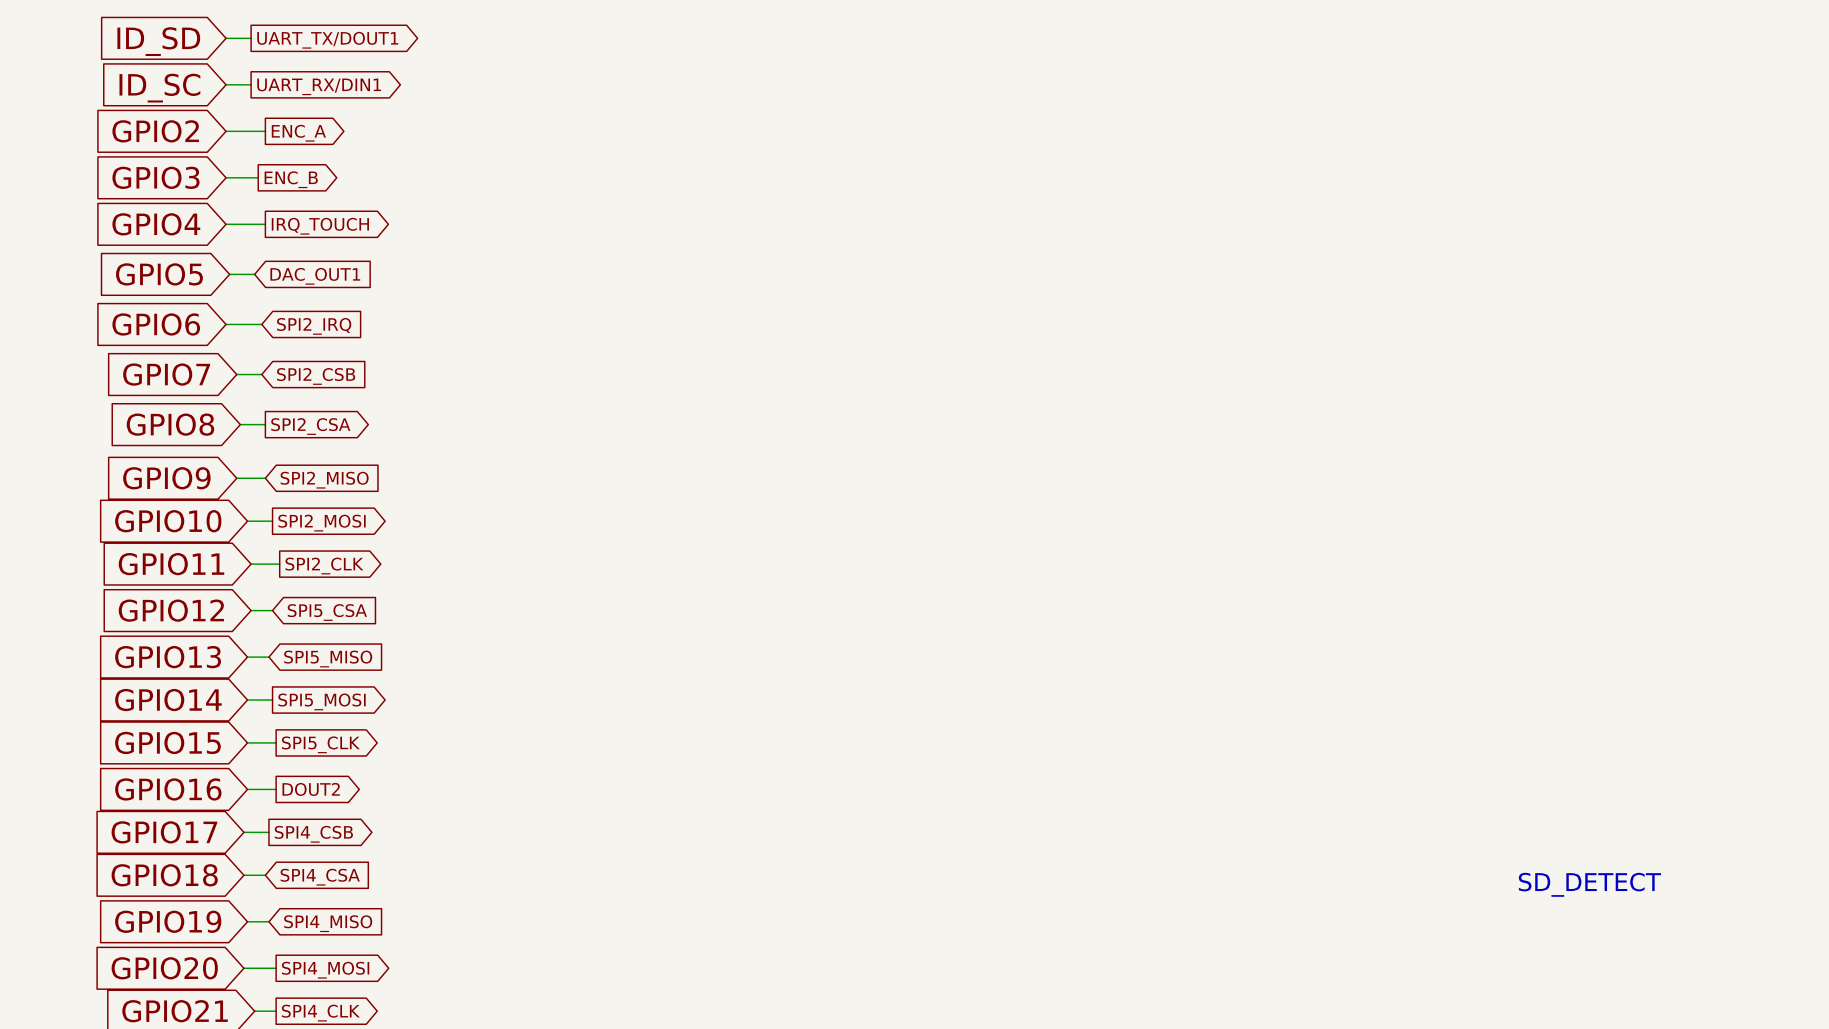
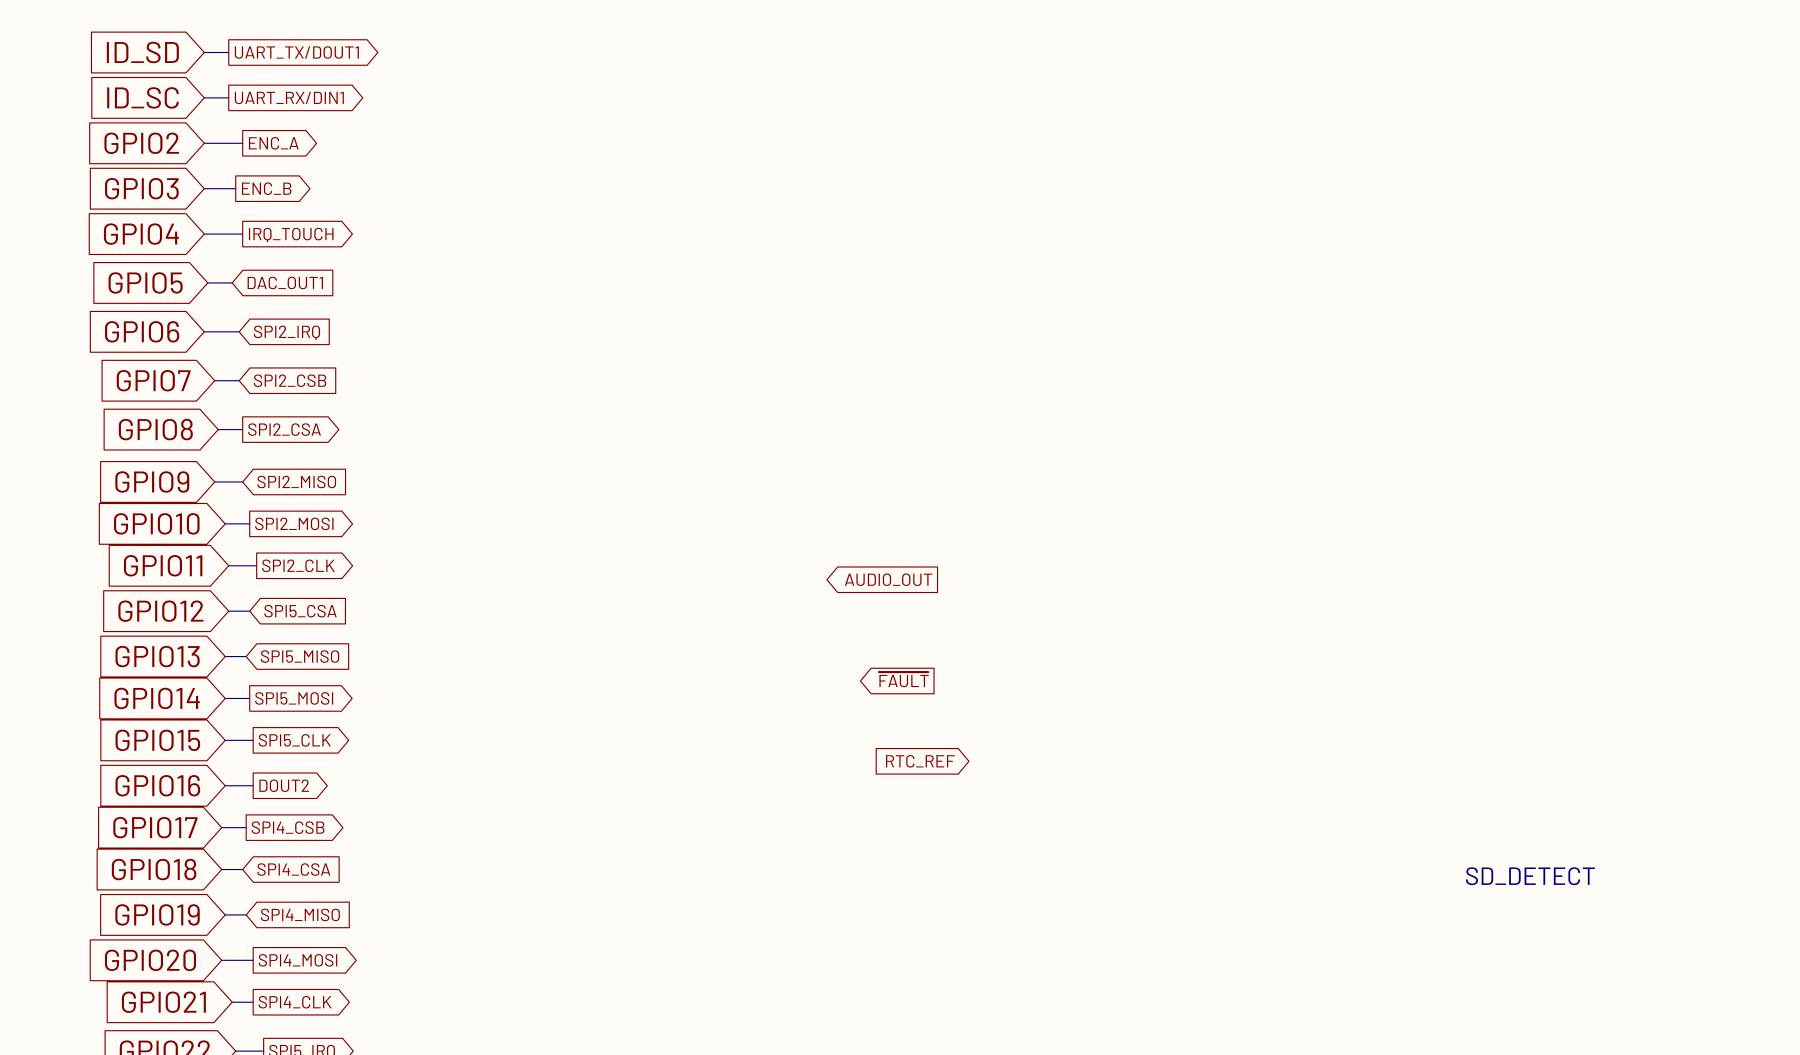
global label: none -> AUDIO_OUT (888, 579)
global label: none -> ~{FAULT} (903, 679)
global label: none -> RTC_REF (920, 761)

